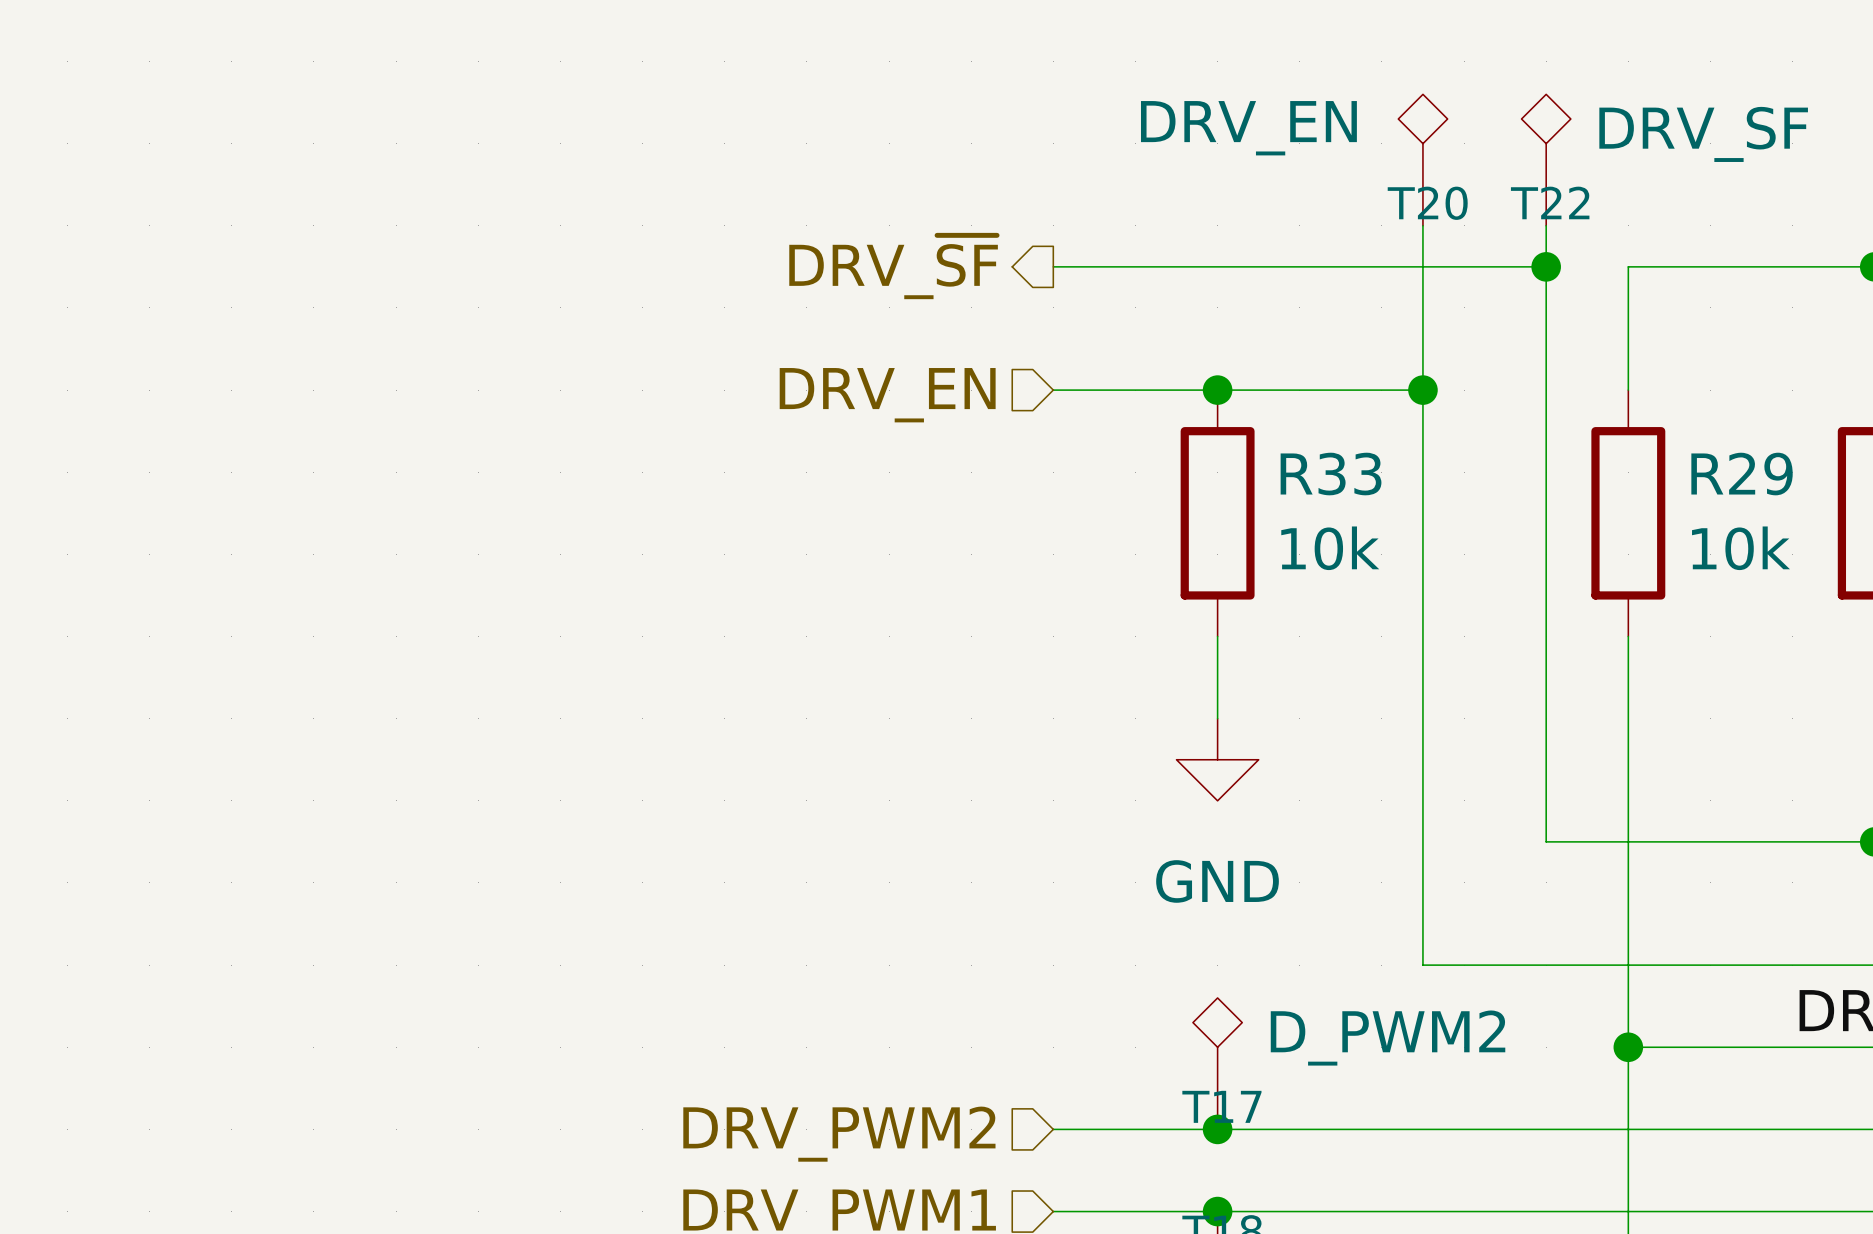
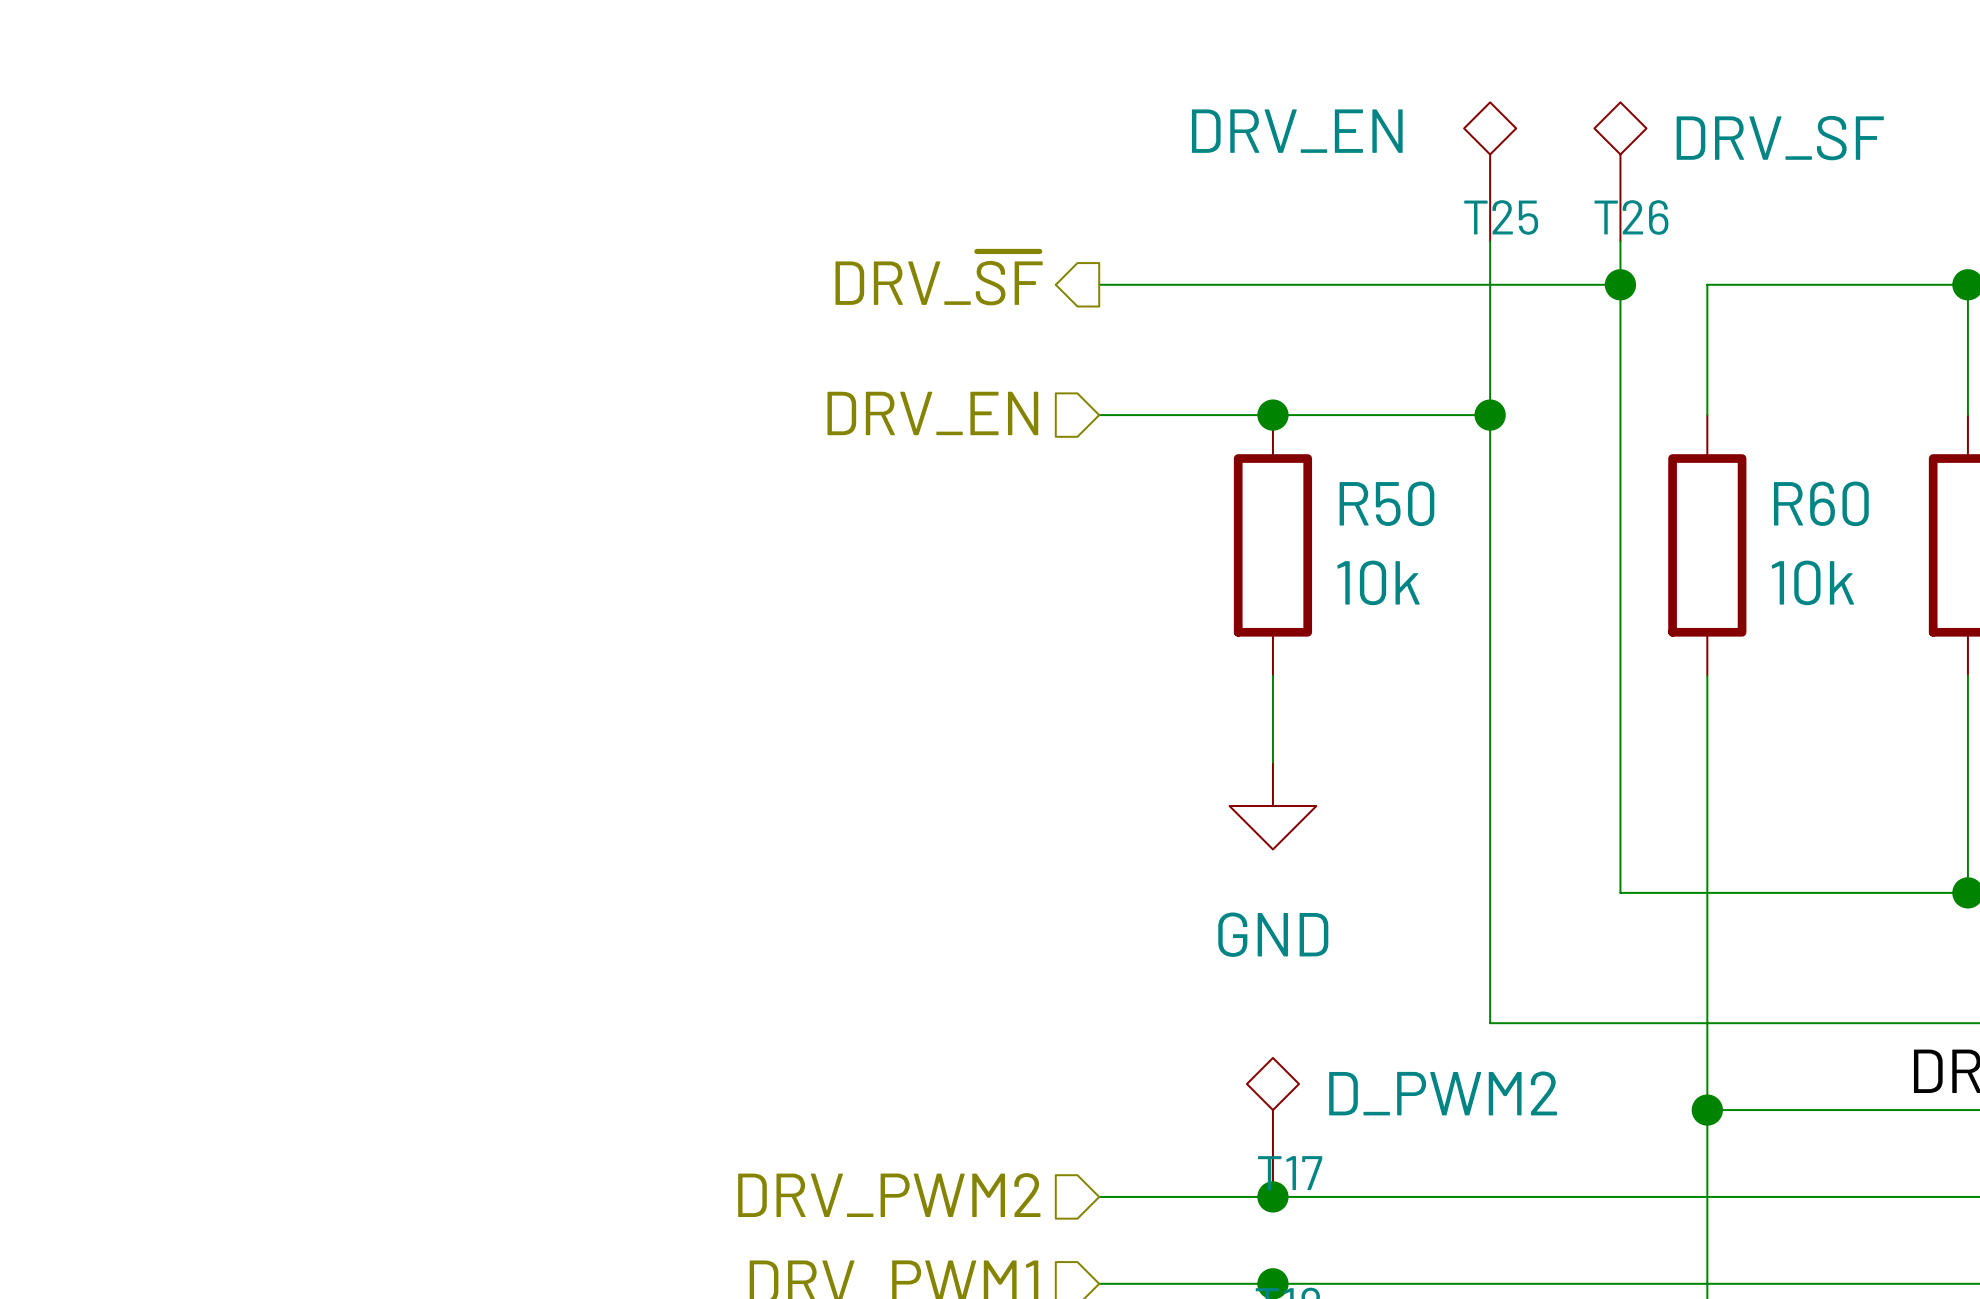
T22 name: T22 (1550, 202) -> T26 (1631, 217)
T20 name: T20 (1427, 203) -> T25 (1501, 217)
R33 name: R33 (1331, 474) -> R50 (1386, 503)
R29 name: R29 (1742, 474) -> R60 (1821, 503)

